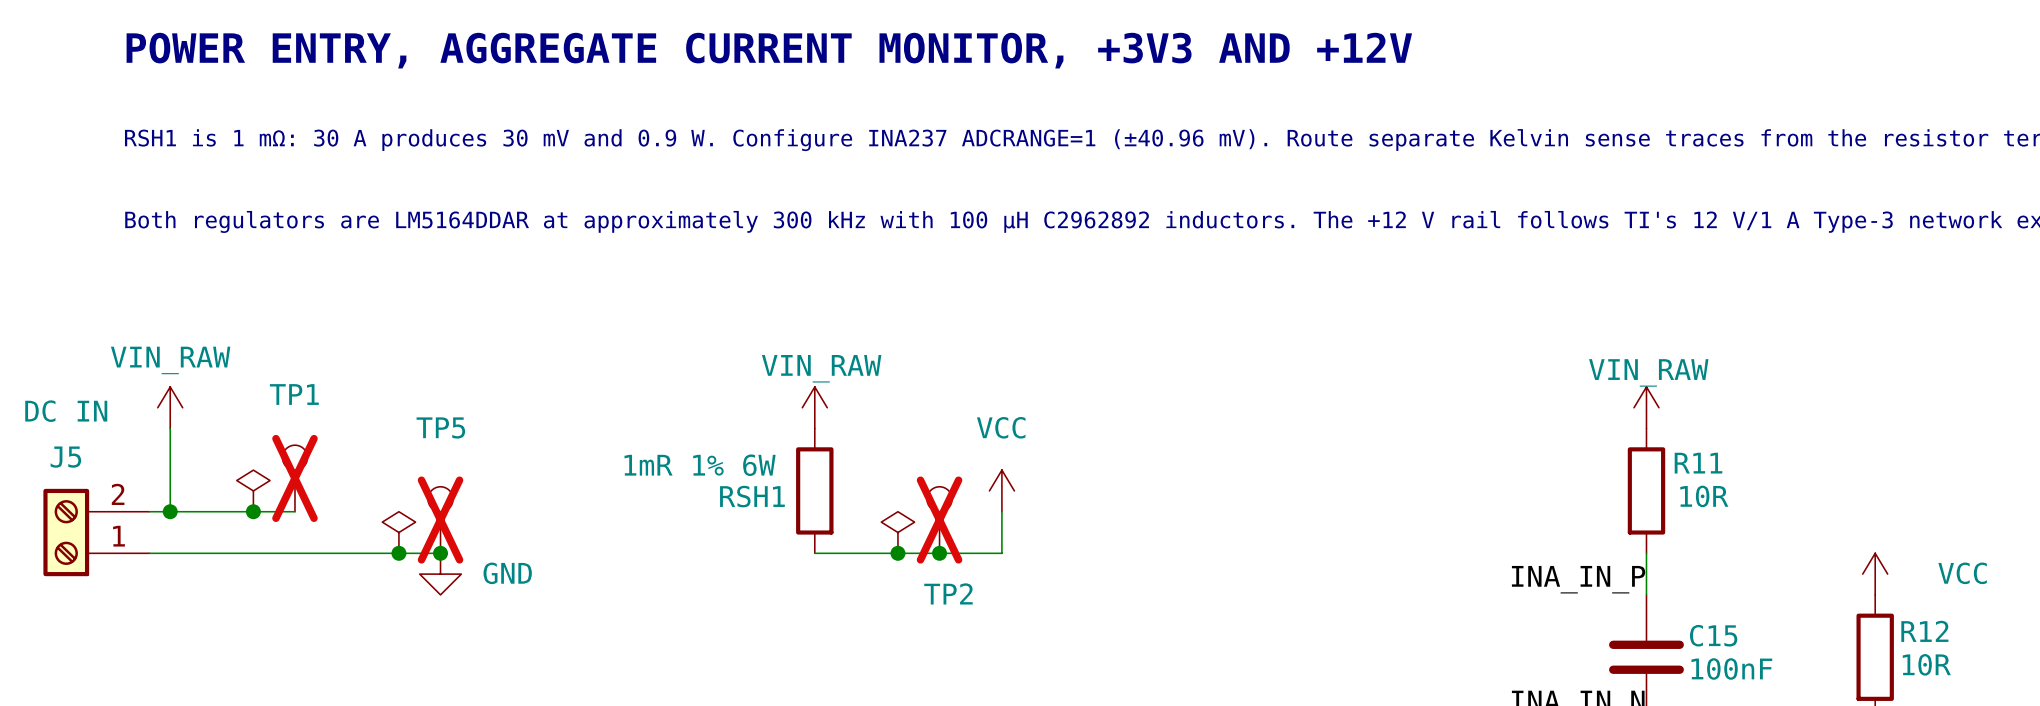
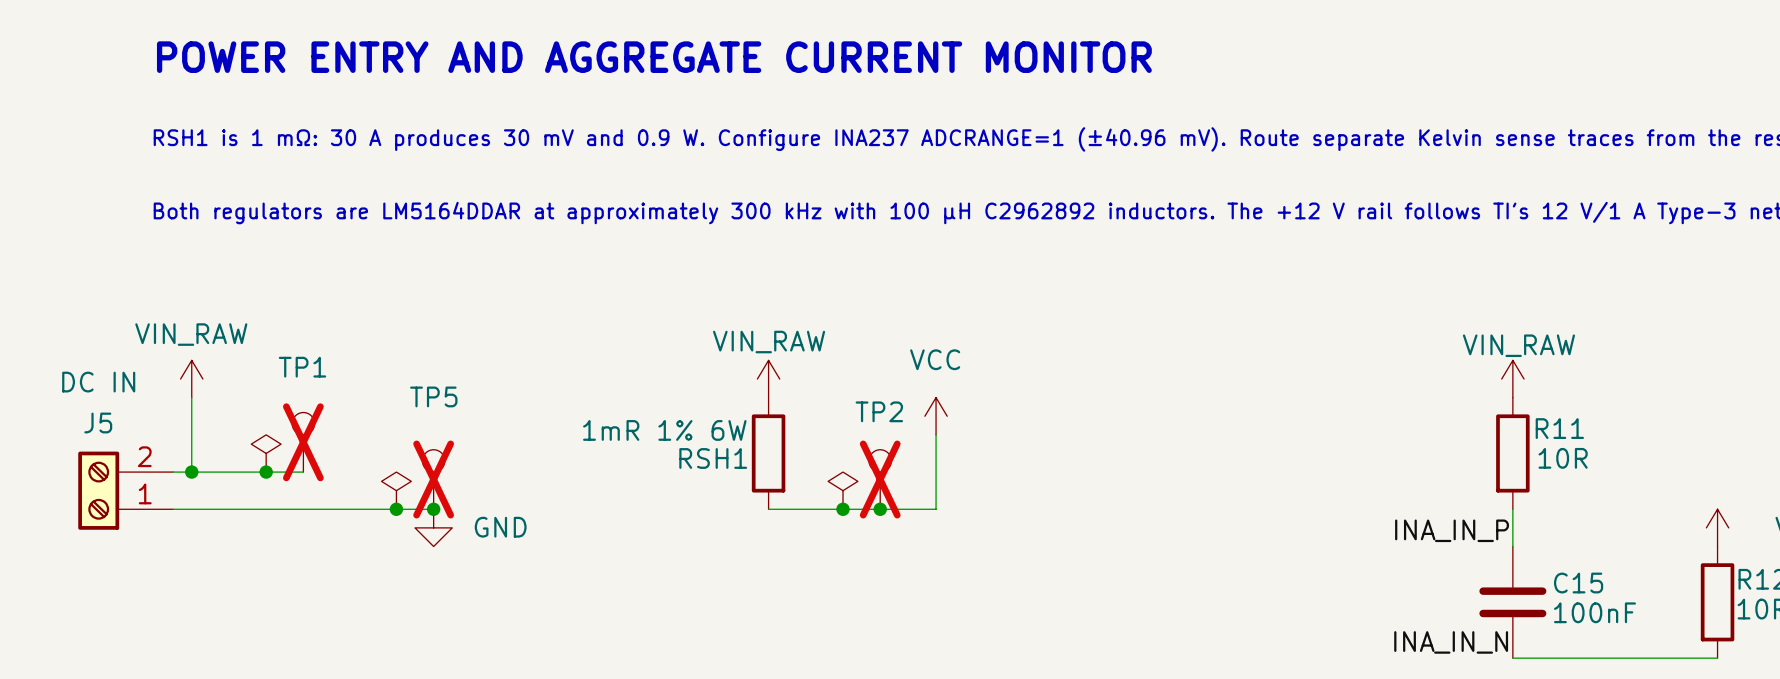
text: POWER ENTRY, AGGREGATE CURRENT MONITOR, +3V3 AND +12V (769, 50) -> POWER ENTRY AND AGGREGATE CURRENT MONITOR (654, 57)
power symbol position: VCC (1001, 490) -> VCC (936, 416)
TP2 name position: TP2 (948, 593) -> TP2 (879, 411)

